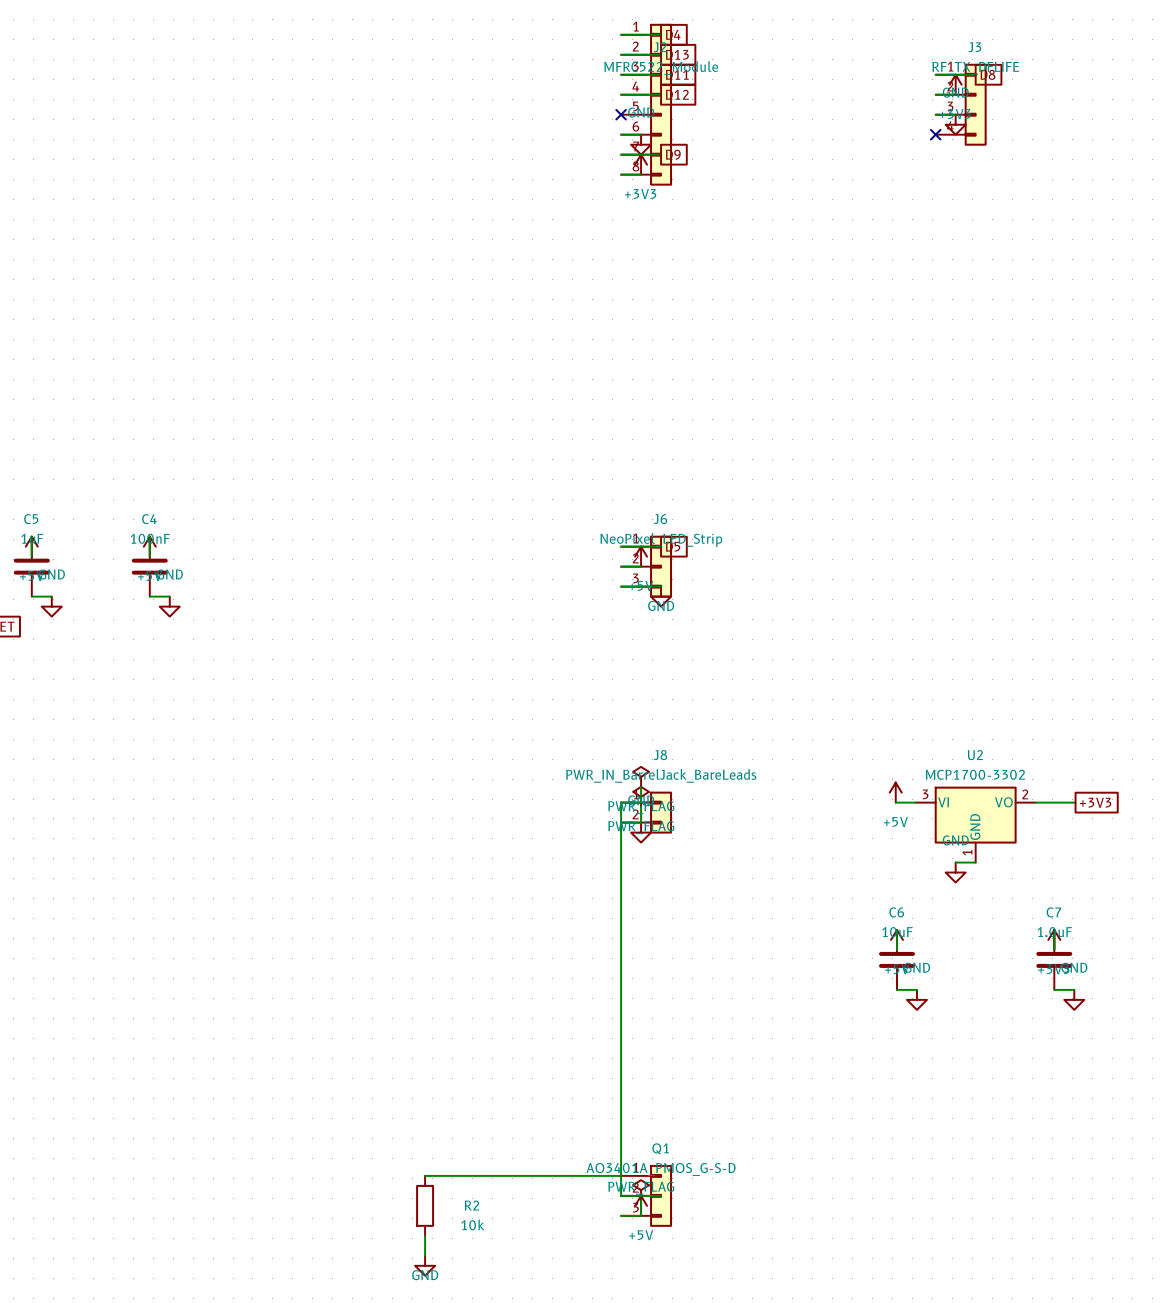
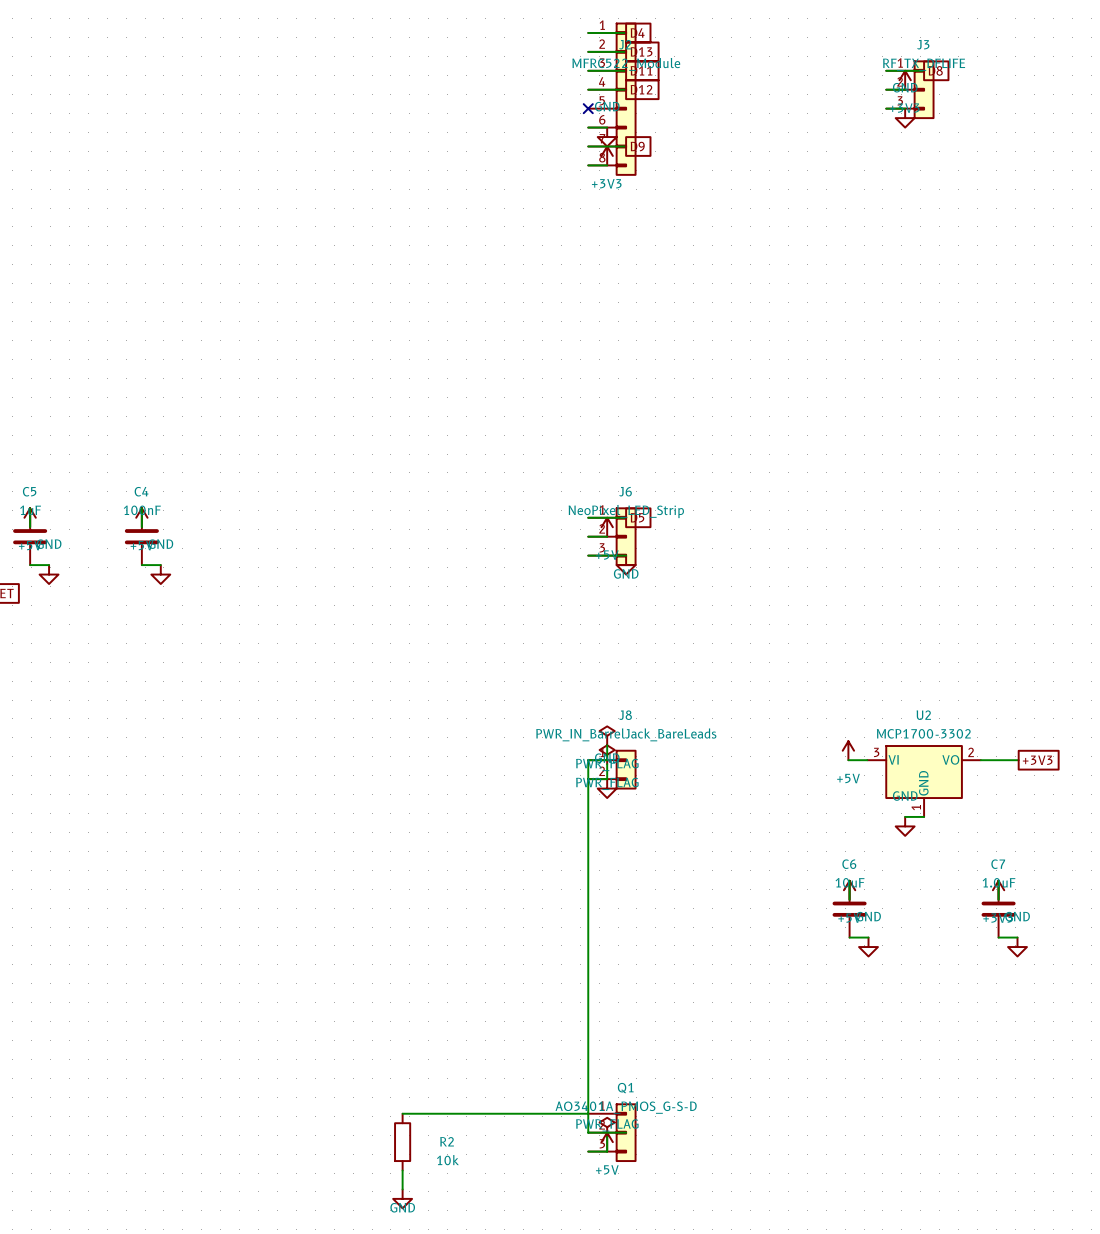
J3 symbol: [935, 63, 987, 146] -> [886, 60, 935, 120]
no-connect mark: (935, 134) -> none

